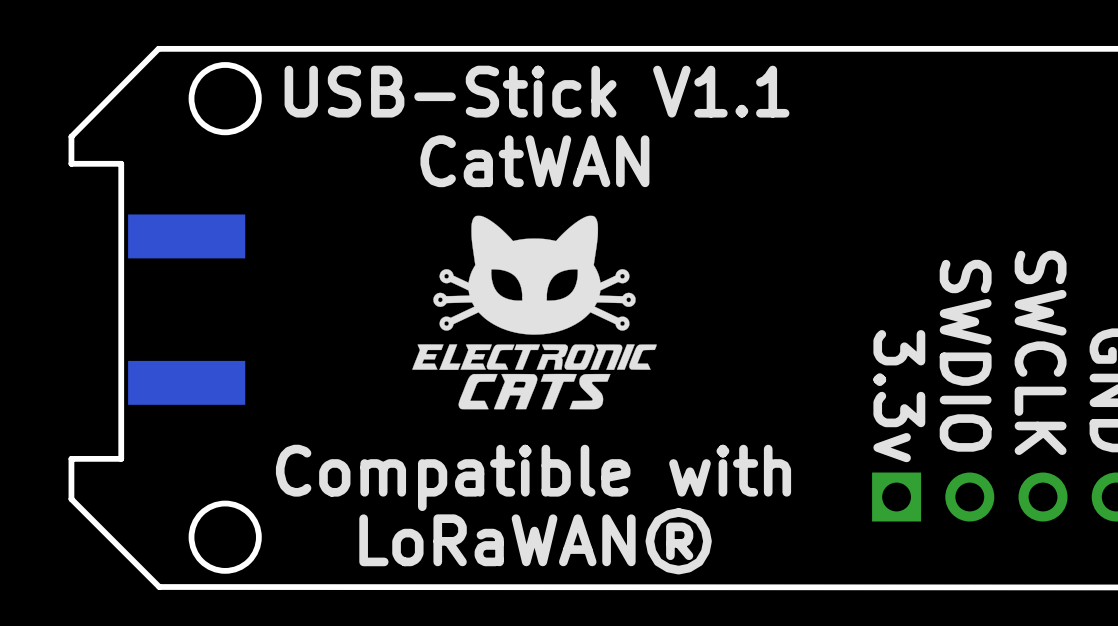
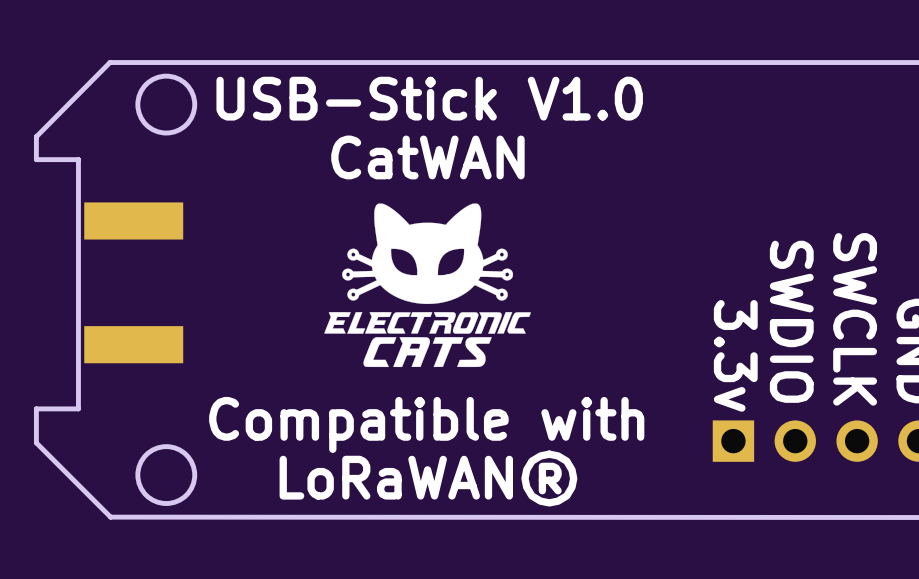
text: USB-Stick V1.1 (537, 91) -> USB-Stick V1.0 (429, 98)

